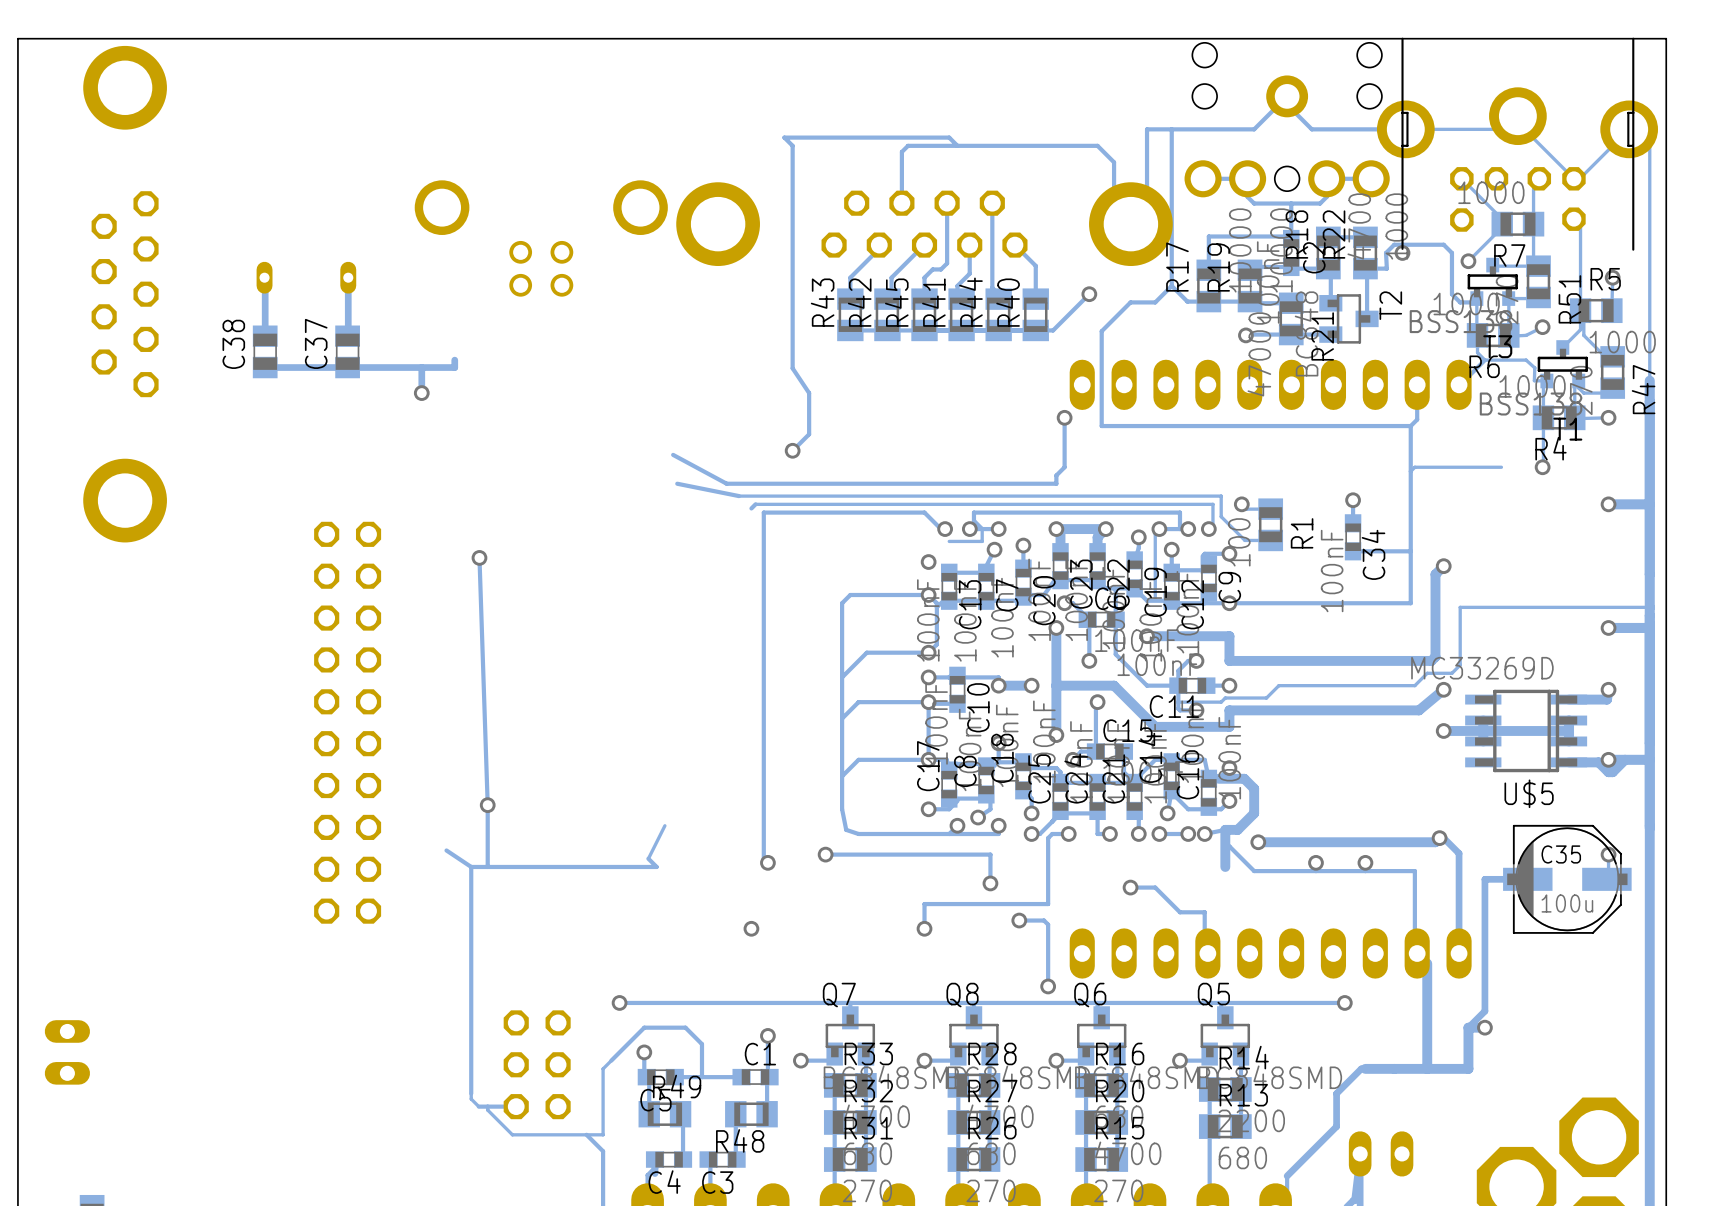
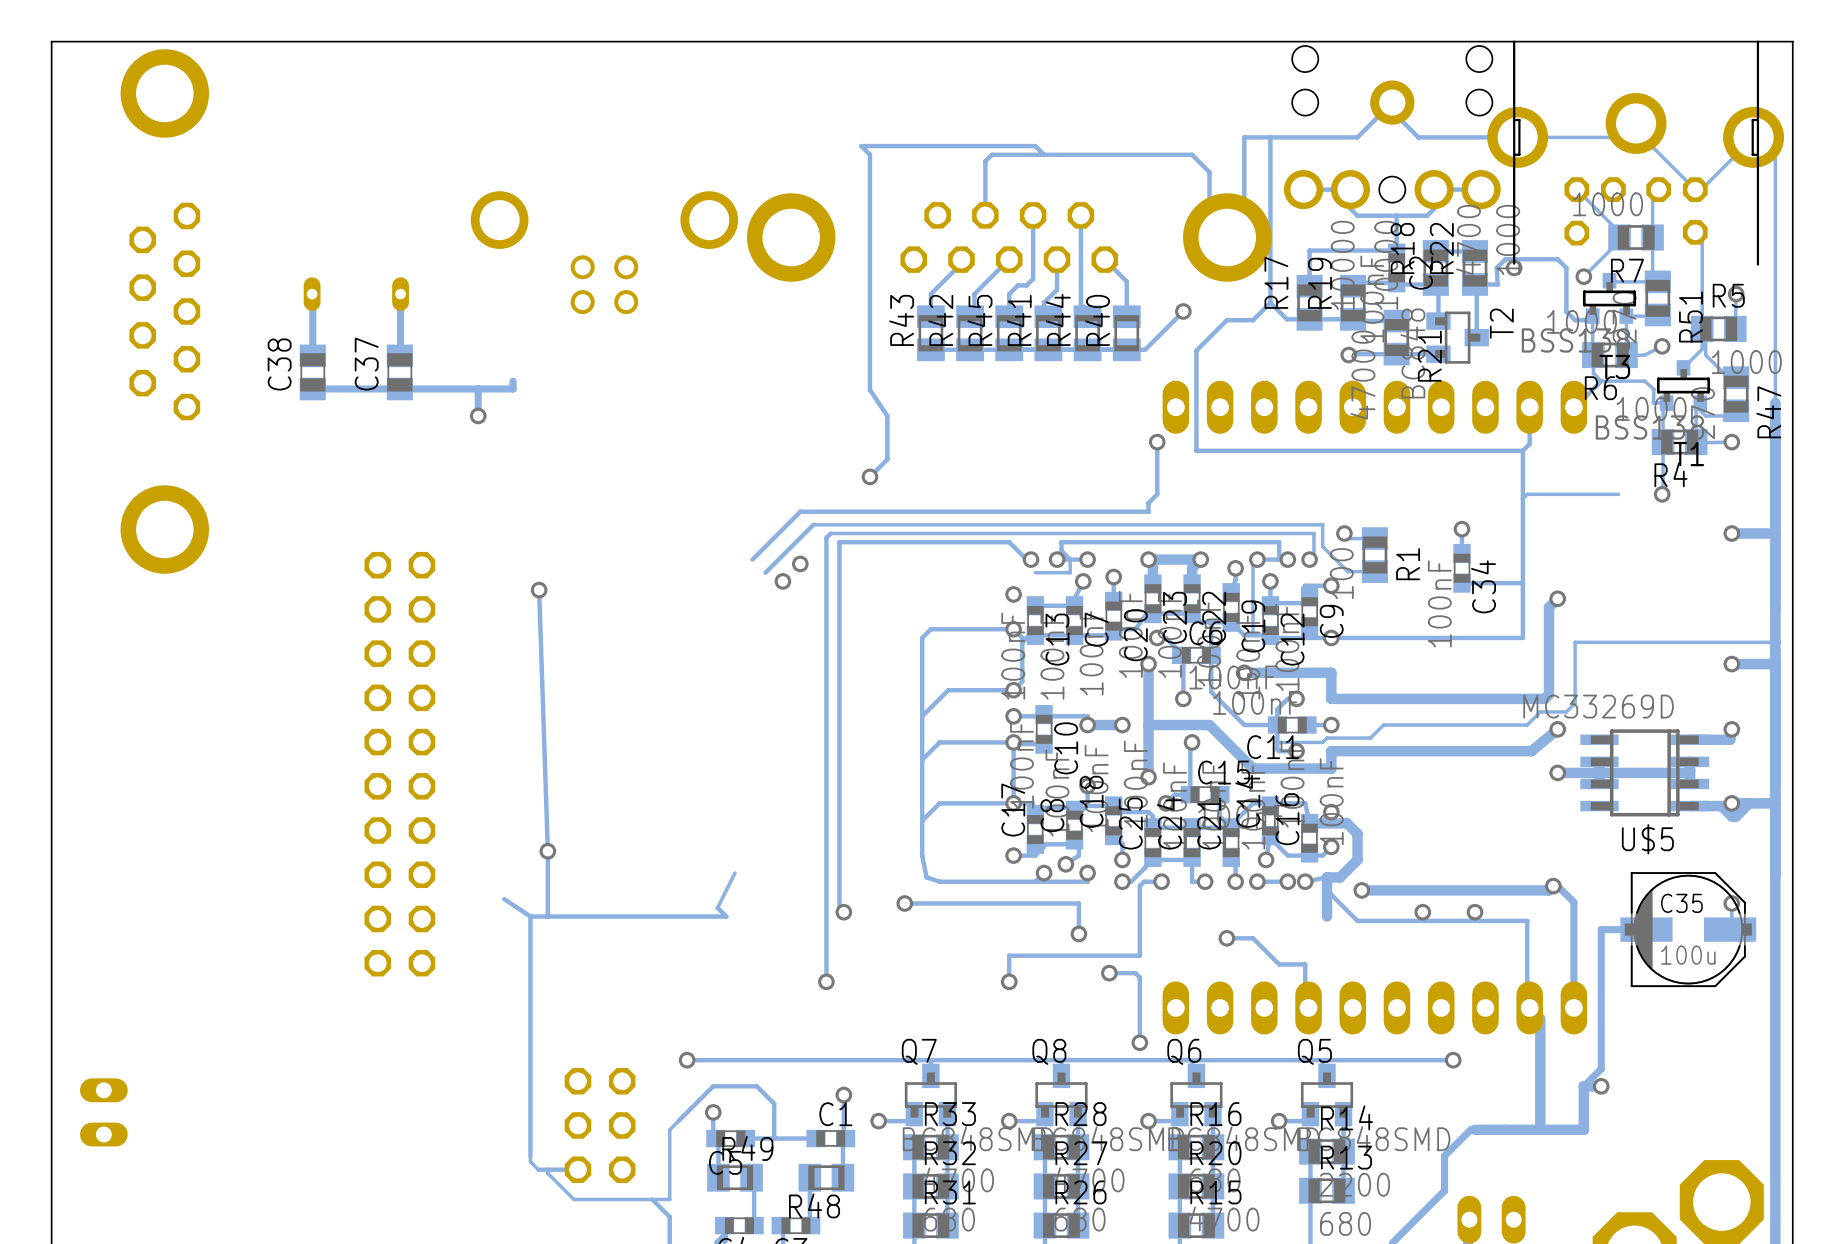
track: (673, 454) (726, 483) -> (752, 559) (800, 511)
track: (677, 483) (739, 496) -> (765, 572) (813, 524)
track: none -> (826, 537) (826, 981)
via: none -> (800, 563)
via: none -> (782, 581)

